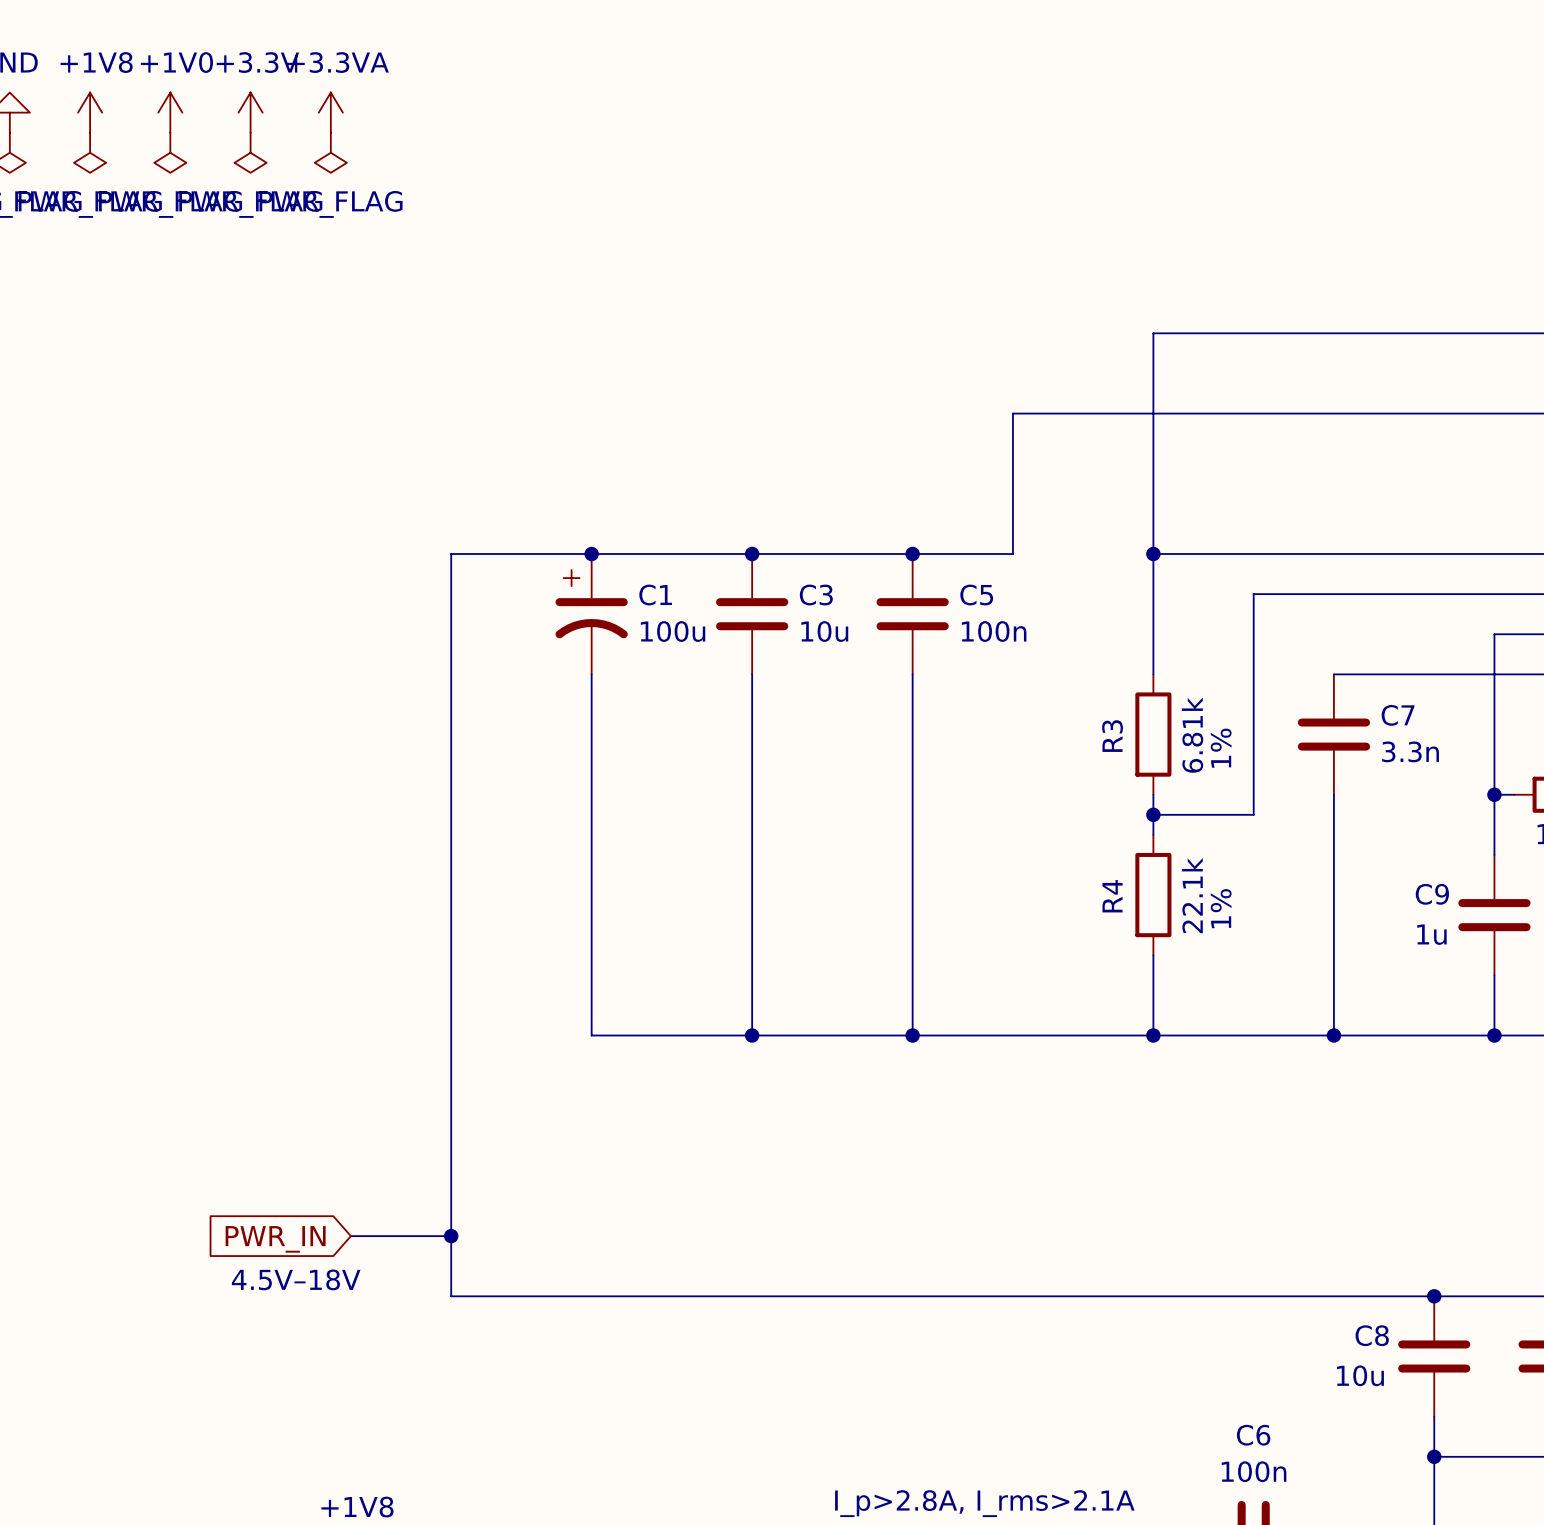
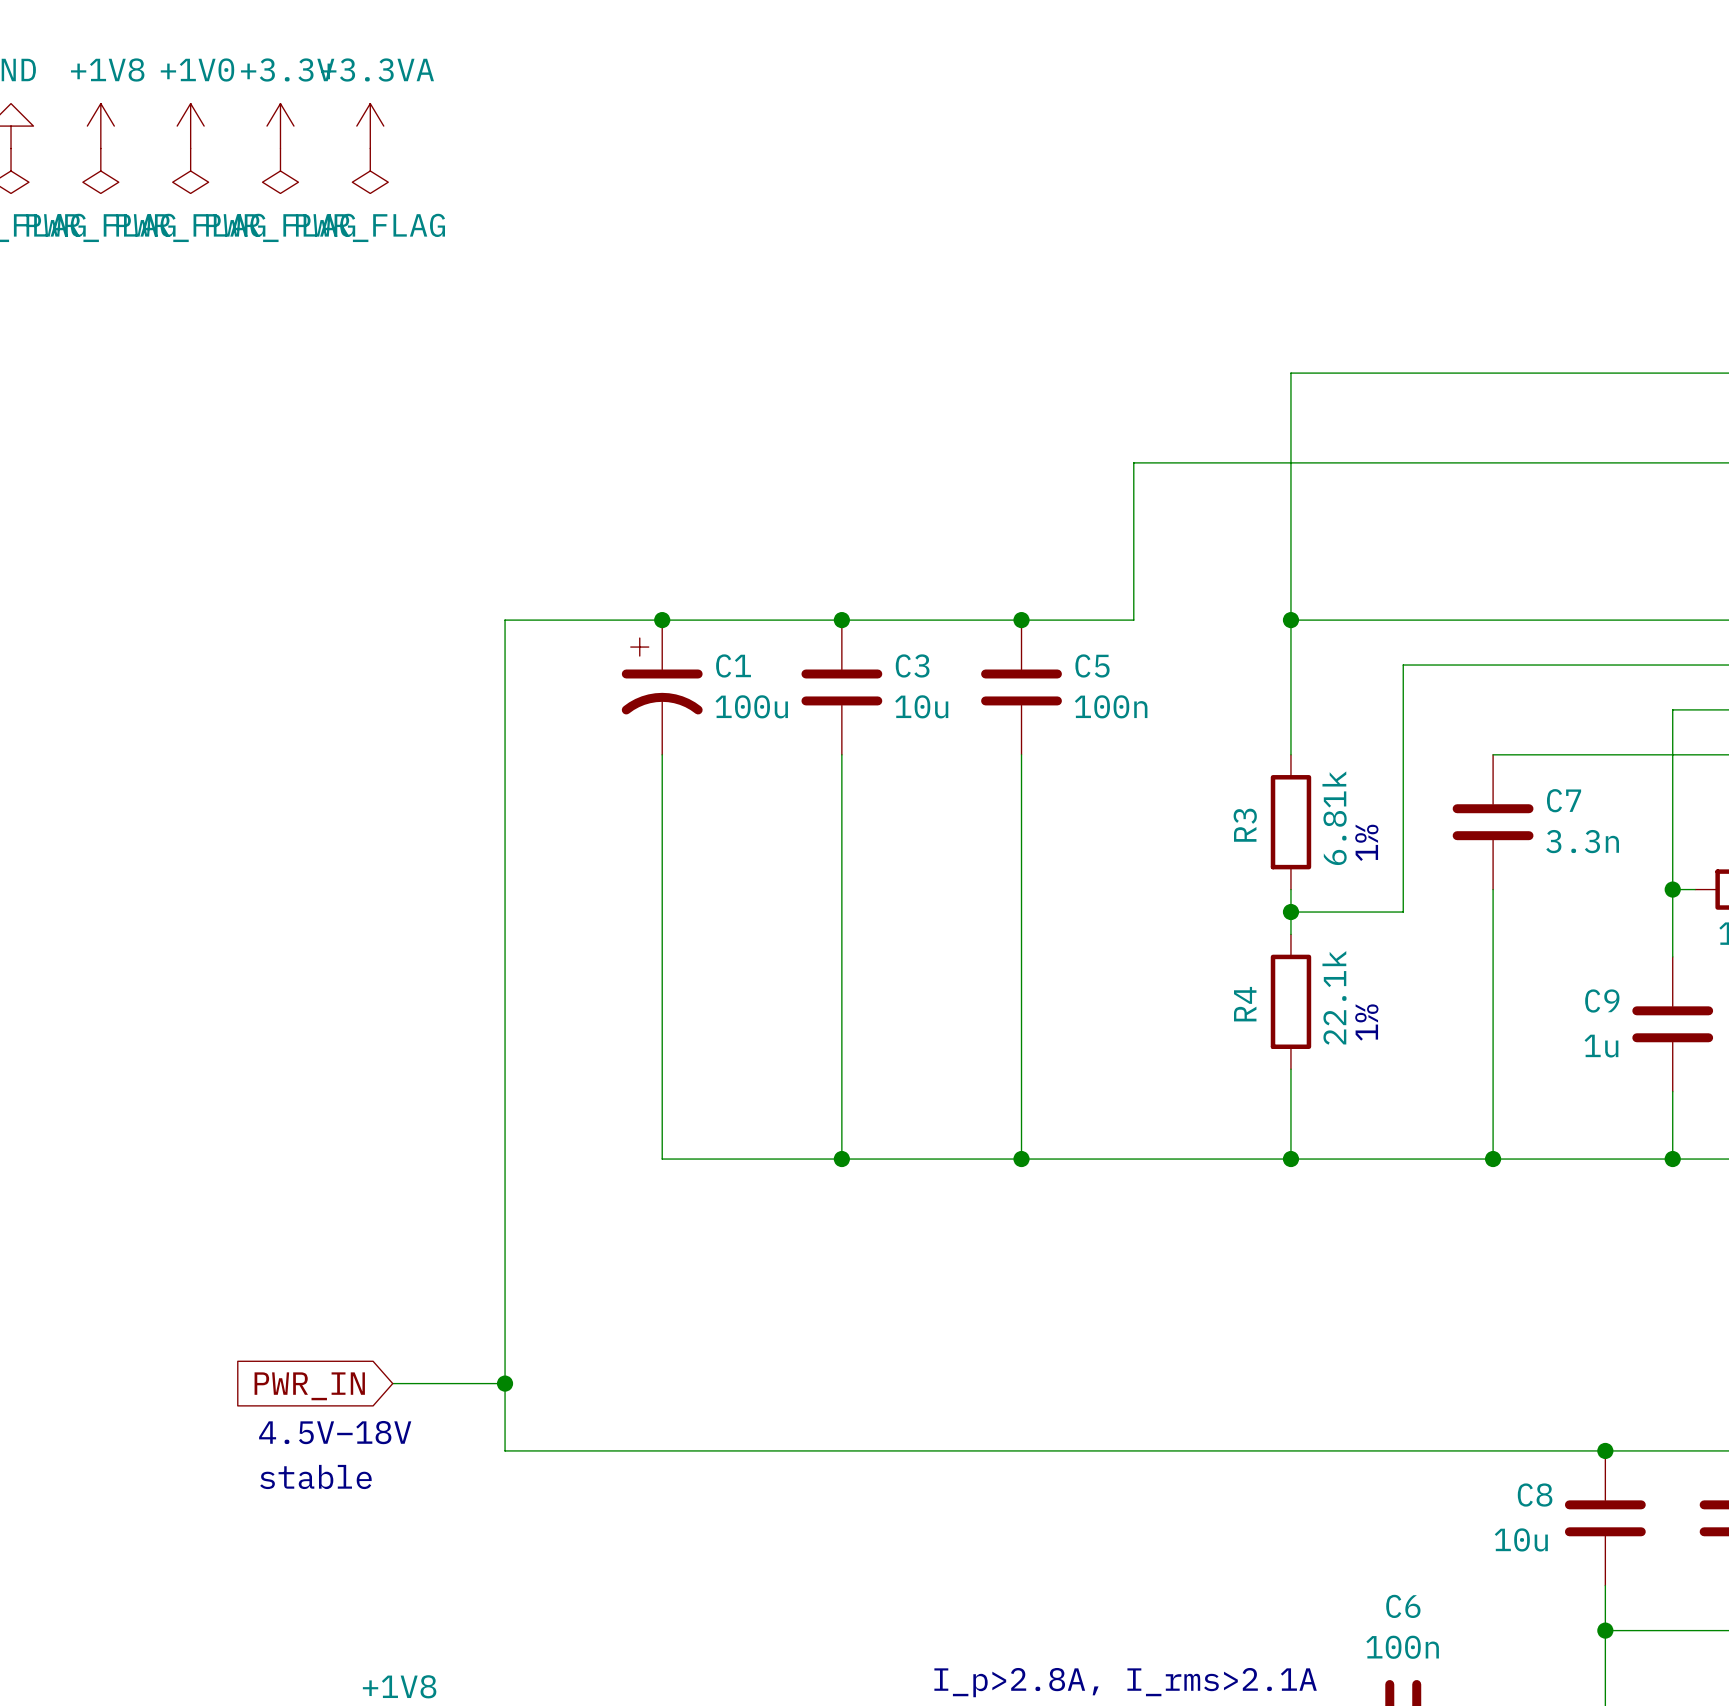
text: none -> stable (315, 1476)

